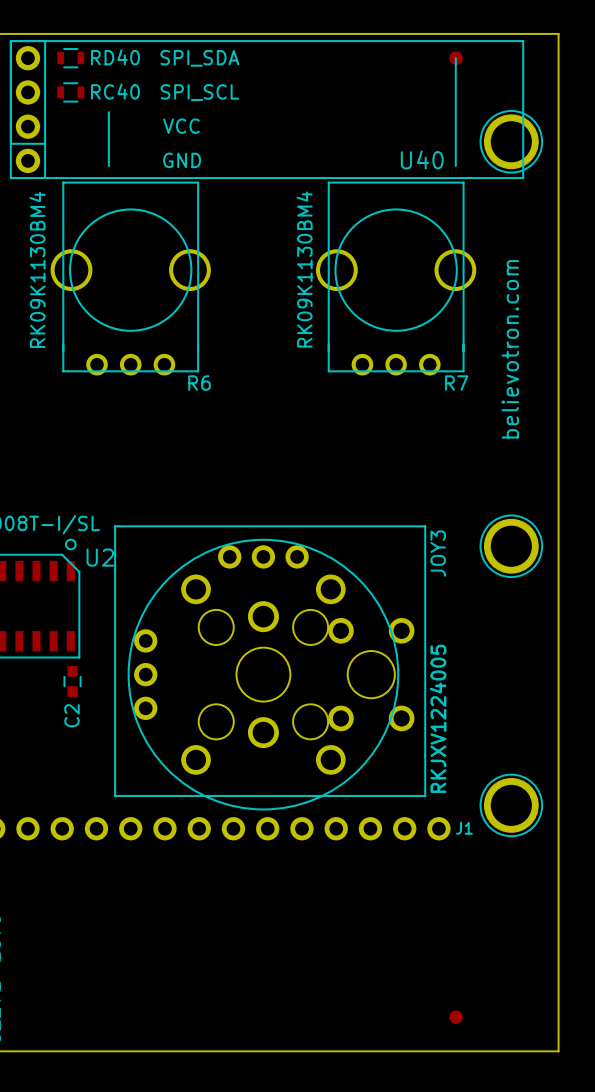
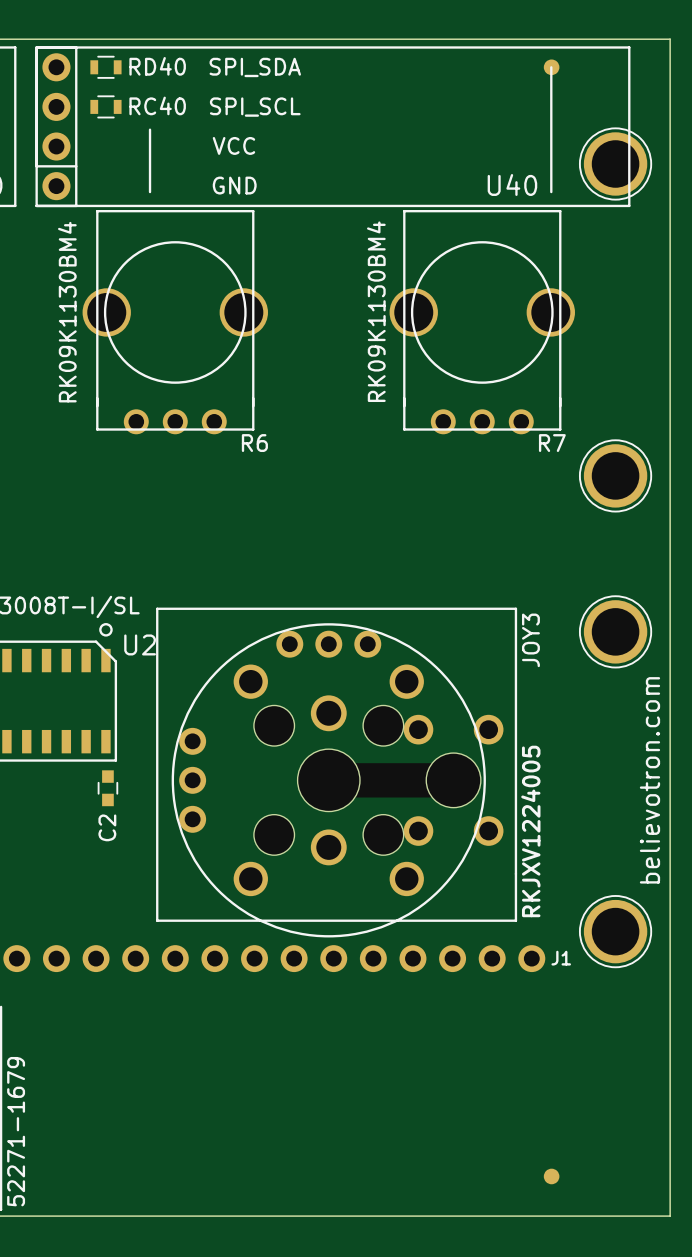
text position: believotron.com (510, 349) -> believotron.com (649, 780)
part: none -> (615, 475)

